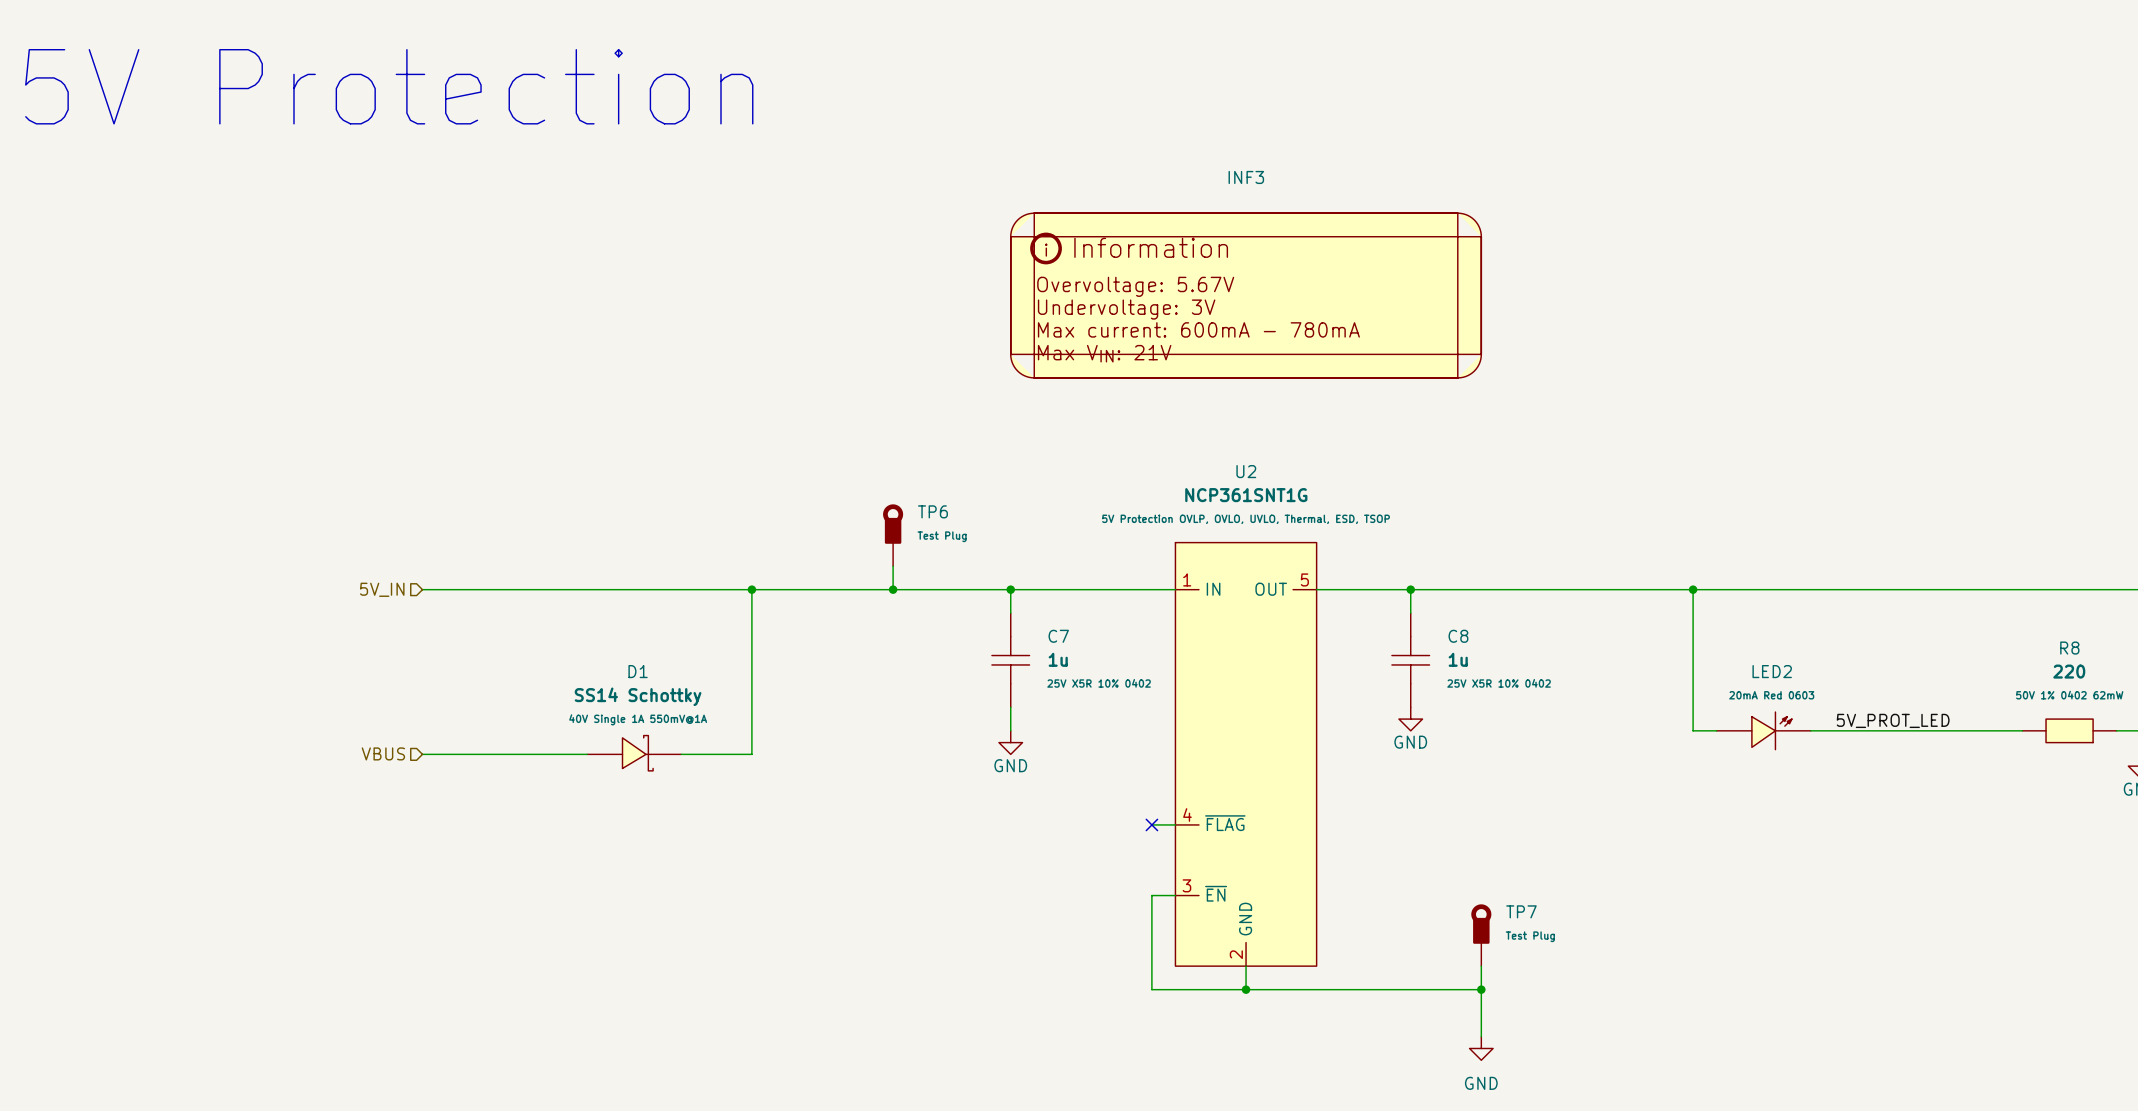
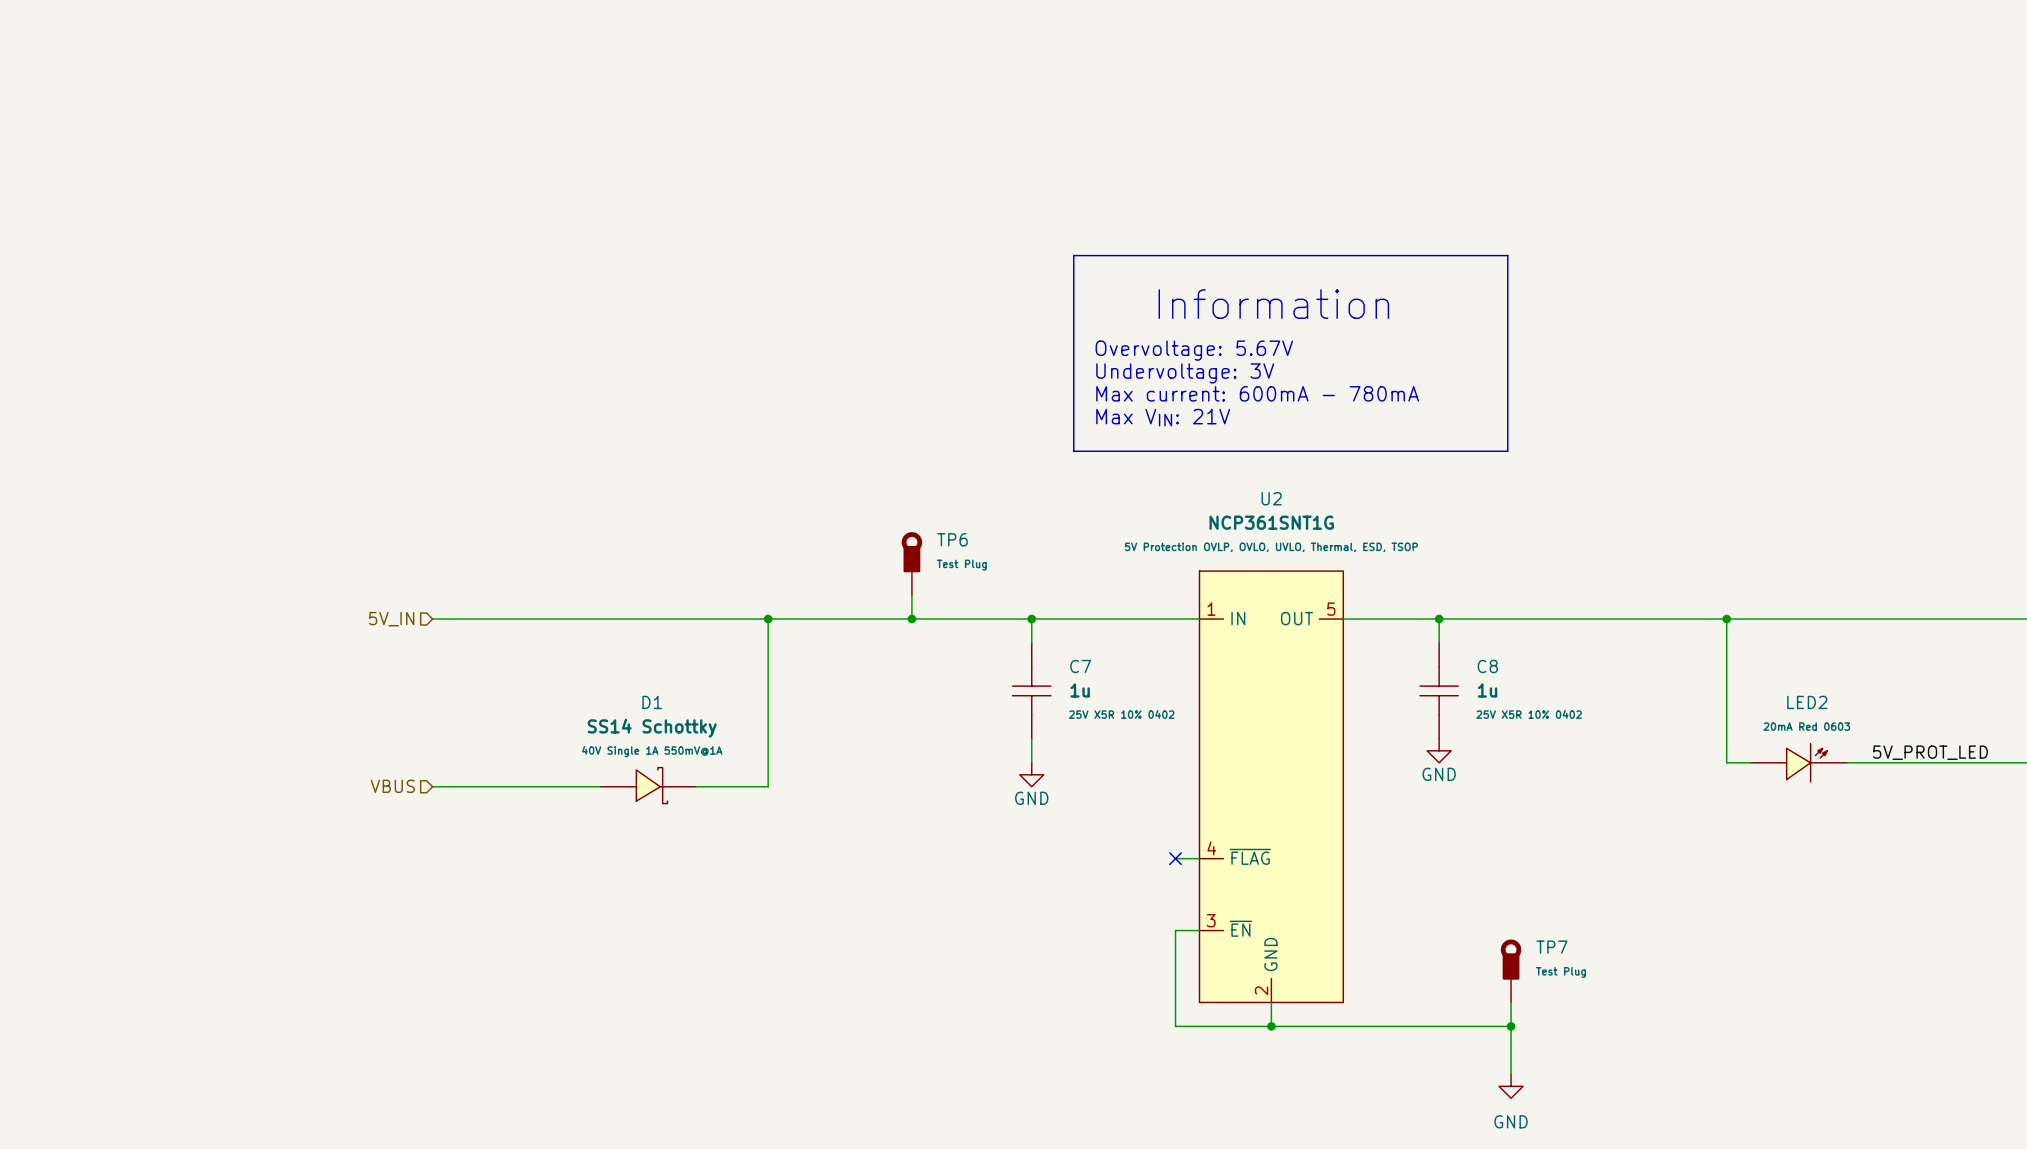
text: 5V Protection (389, 86) -> none
line: none -> (1073, 255) (1507, 255) (1507, 451) (1073, 451) (1073, 255)
text: none -> Information (1273, 304)
INF3: (1246, 295) -> none
text: none -> Overvoltage: 5.67V (1194, 350)
text: none -> Undervoltage: 3V (1185, 373)
text: none -> Max current: 600mA - 780mA (1257, 393)
text: none -> Max VIN: 21V (1163, 417)

